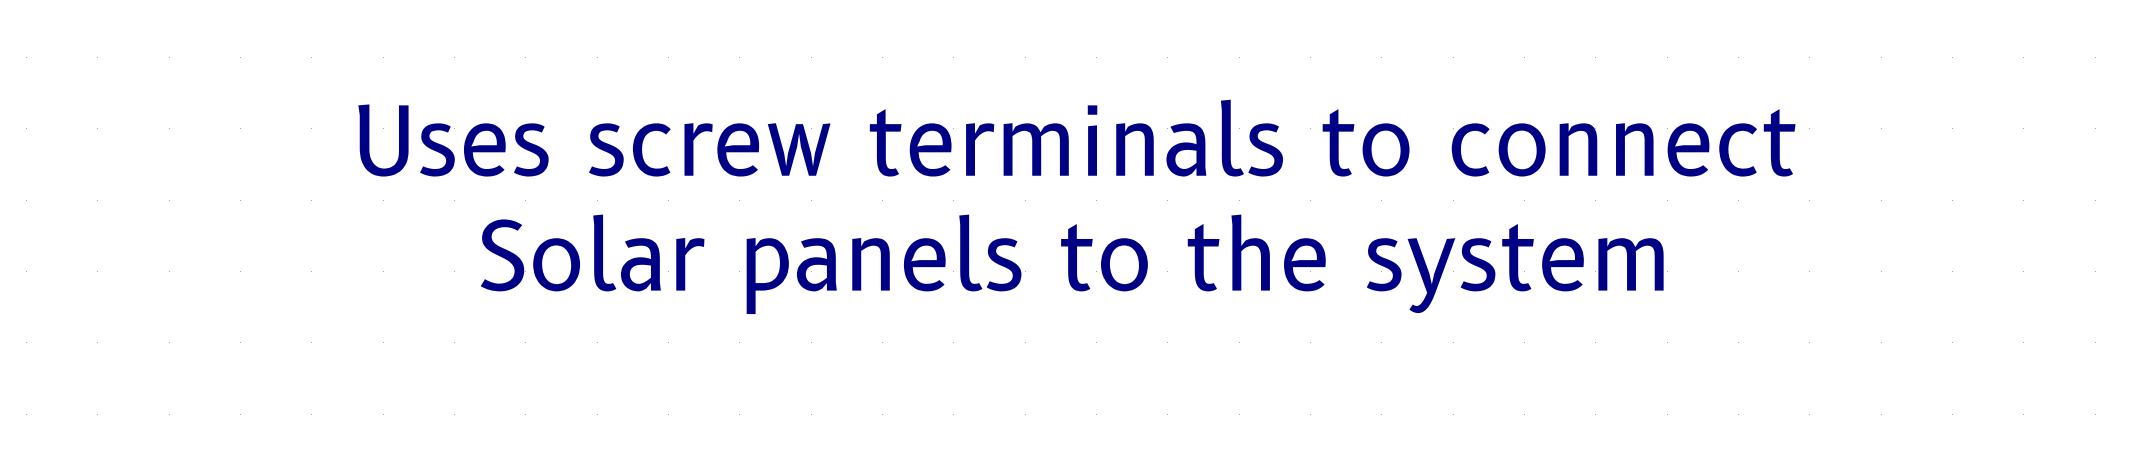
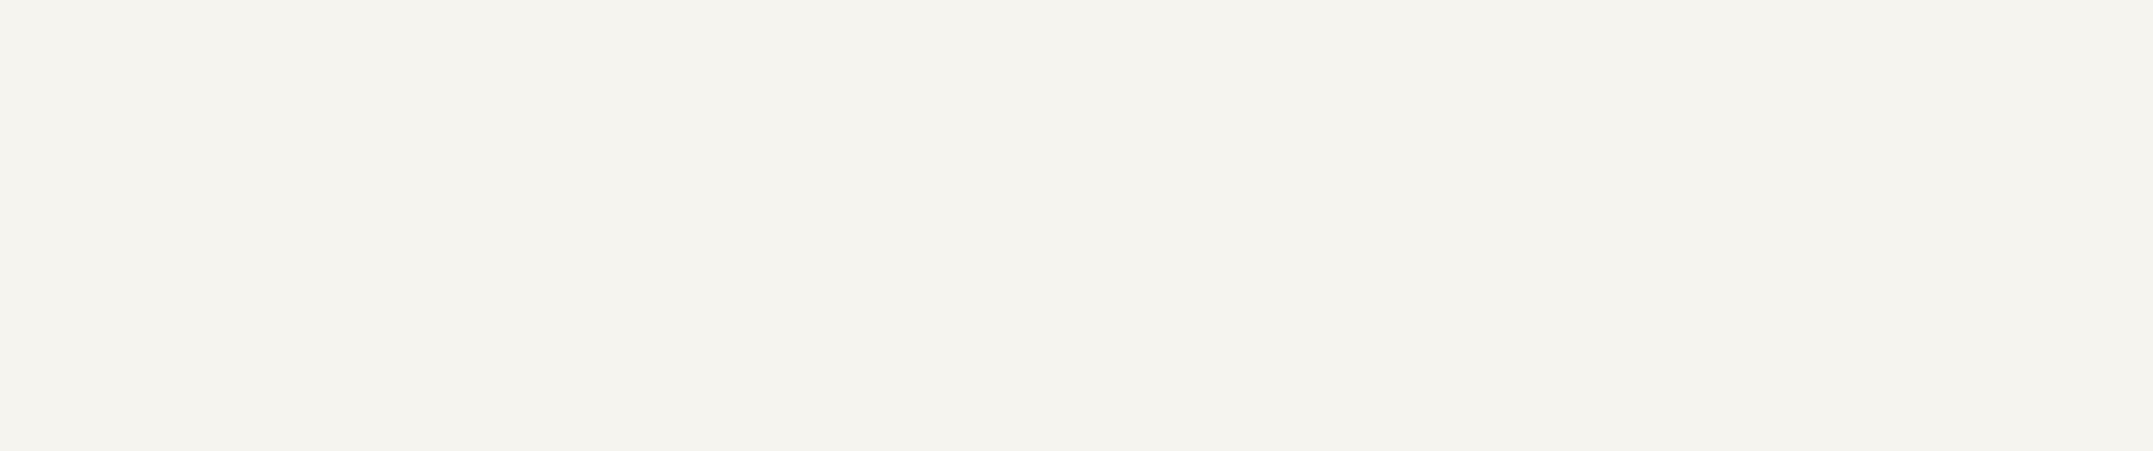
text: Uses screw terminals to connect (1076, 138) -> none
text: Solar panels to the system (1072, 264) -> none

